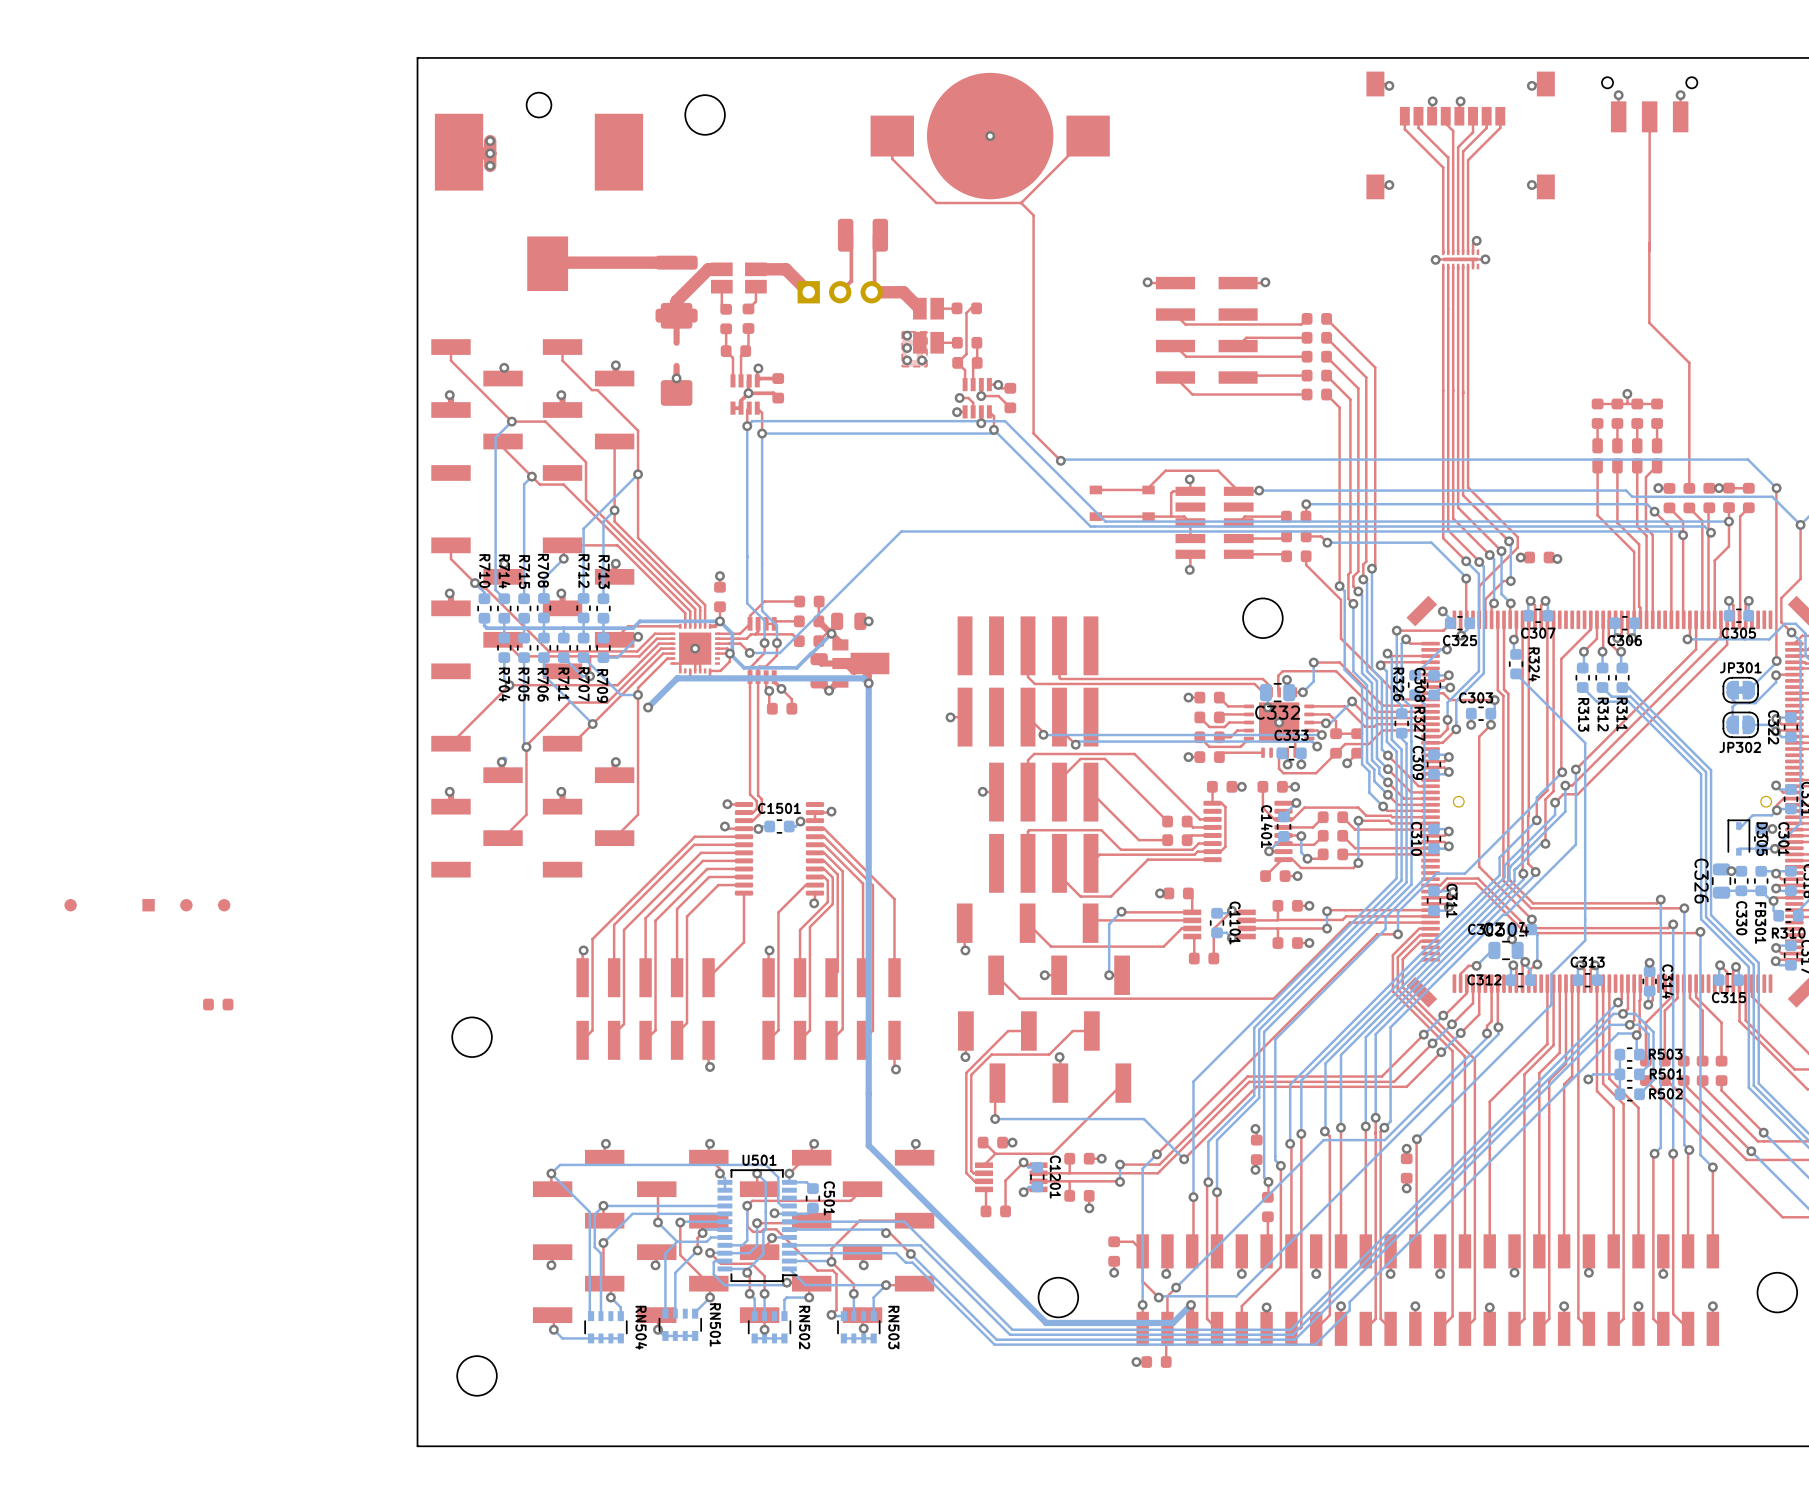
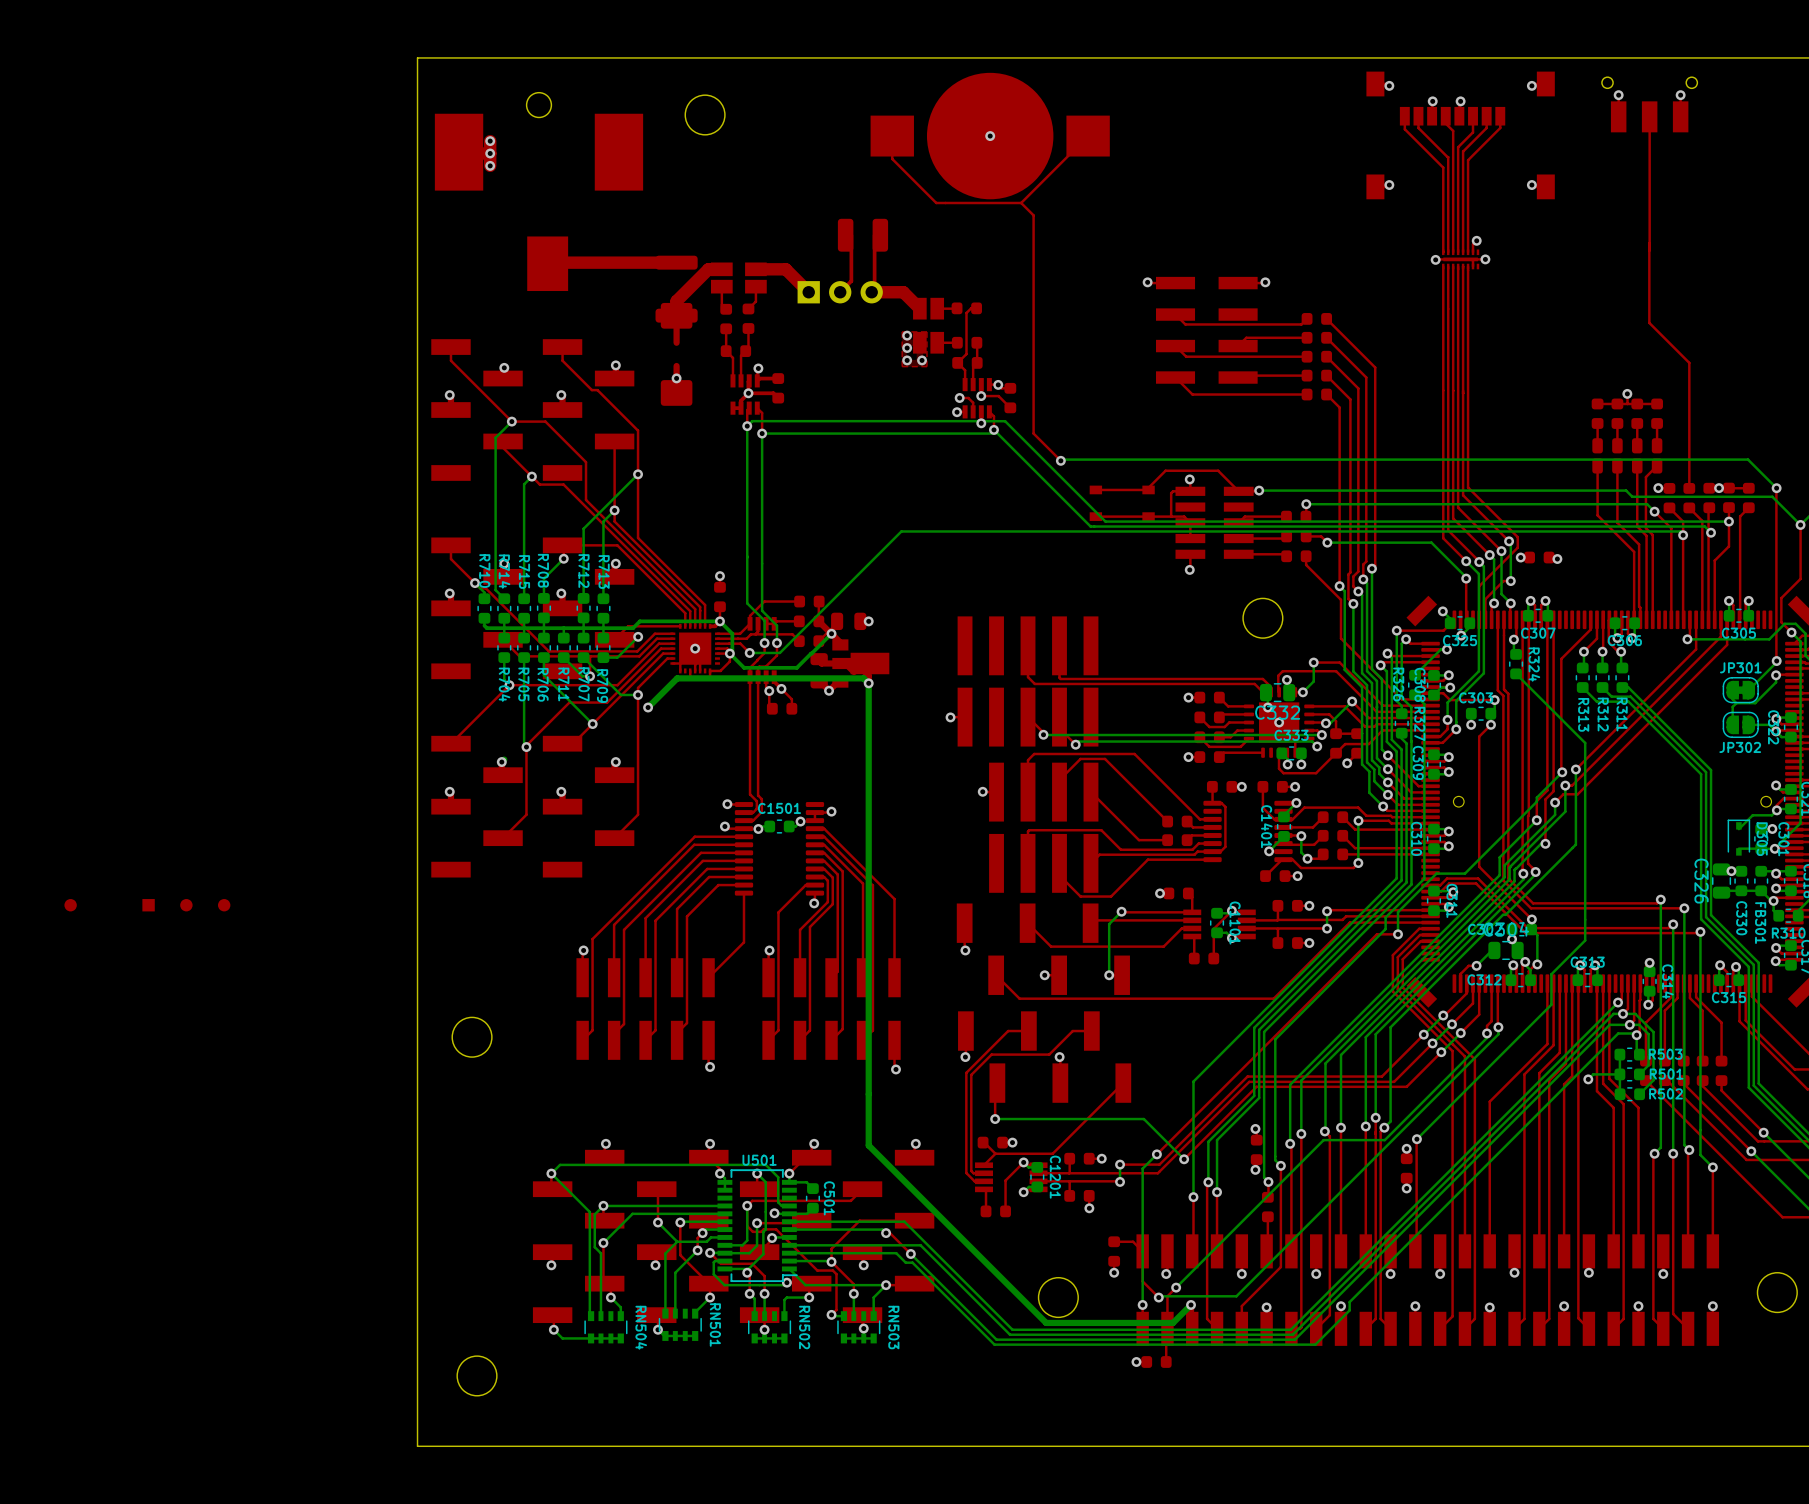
part: (218, 1004) -> none

